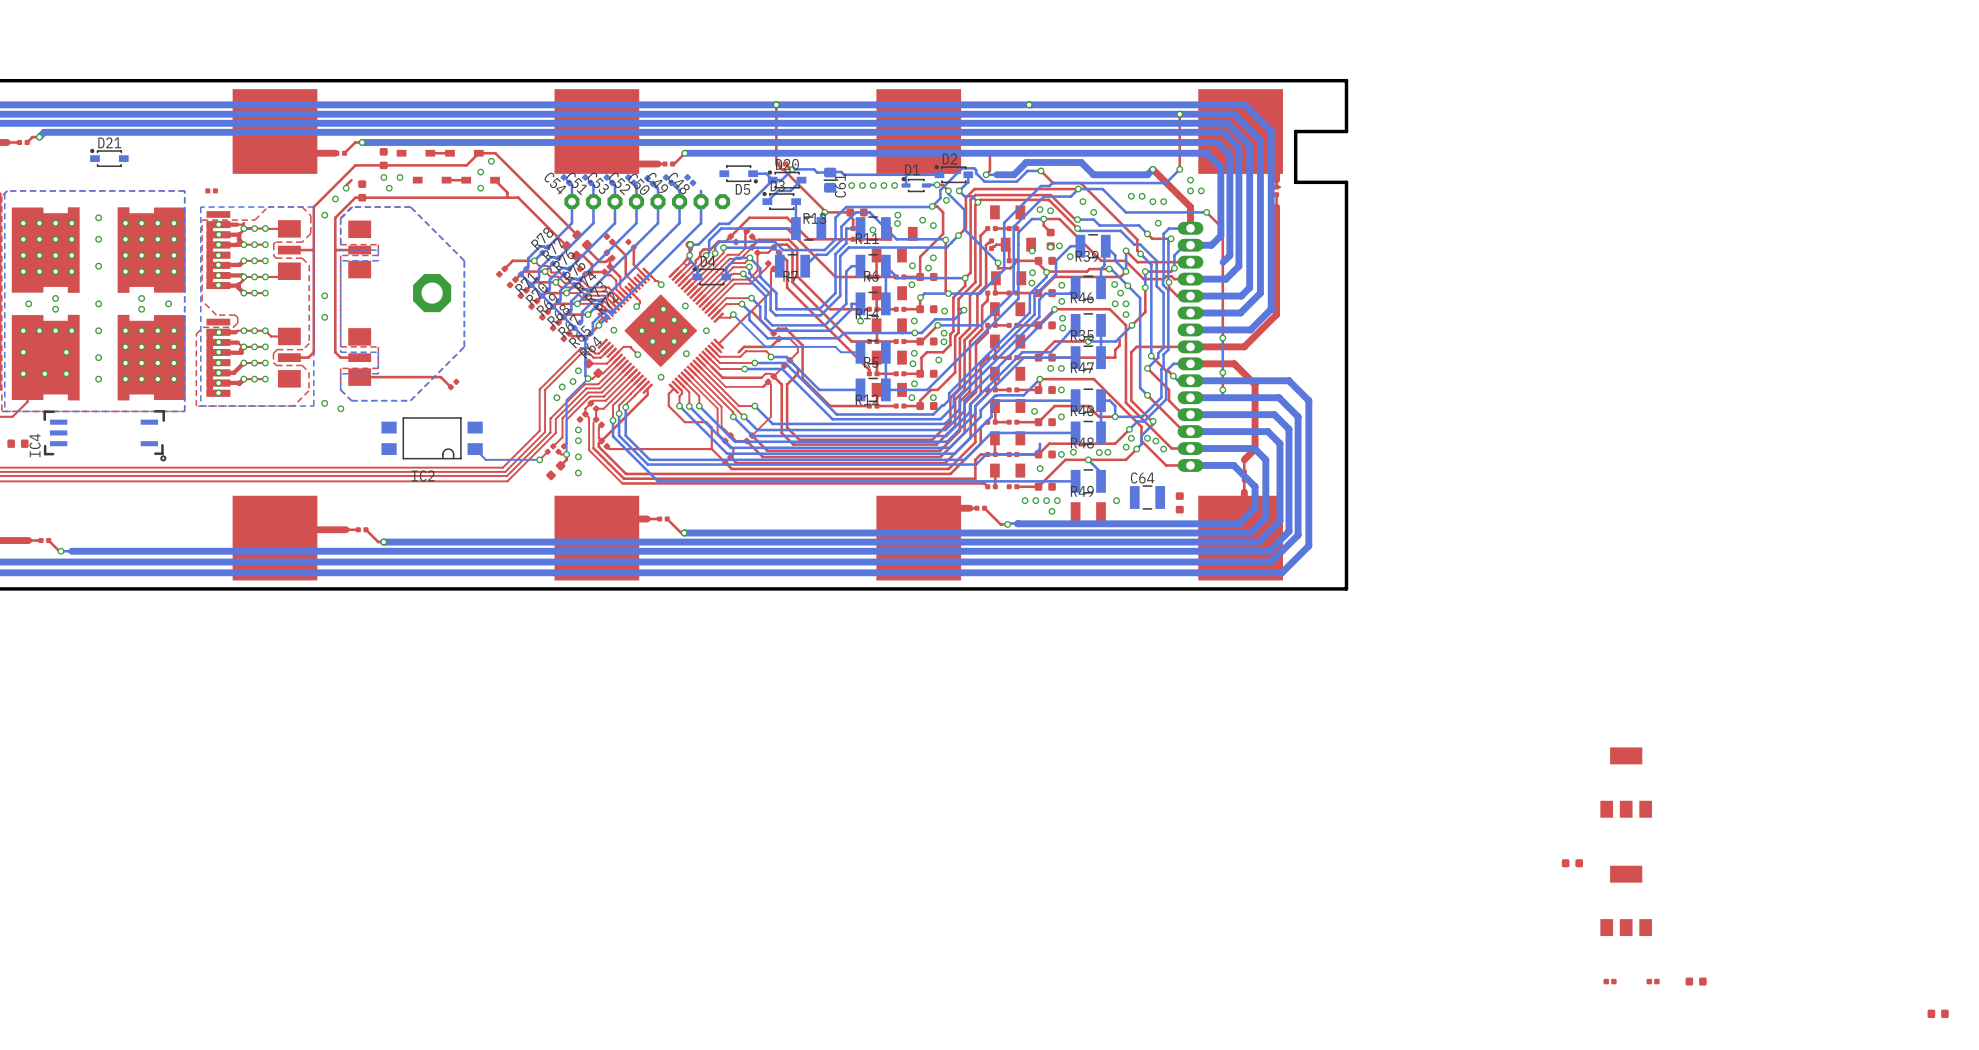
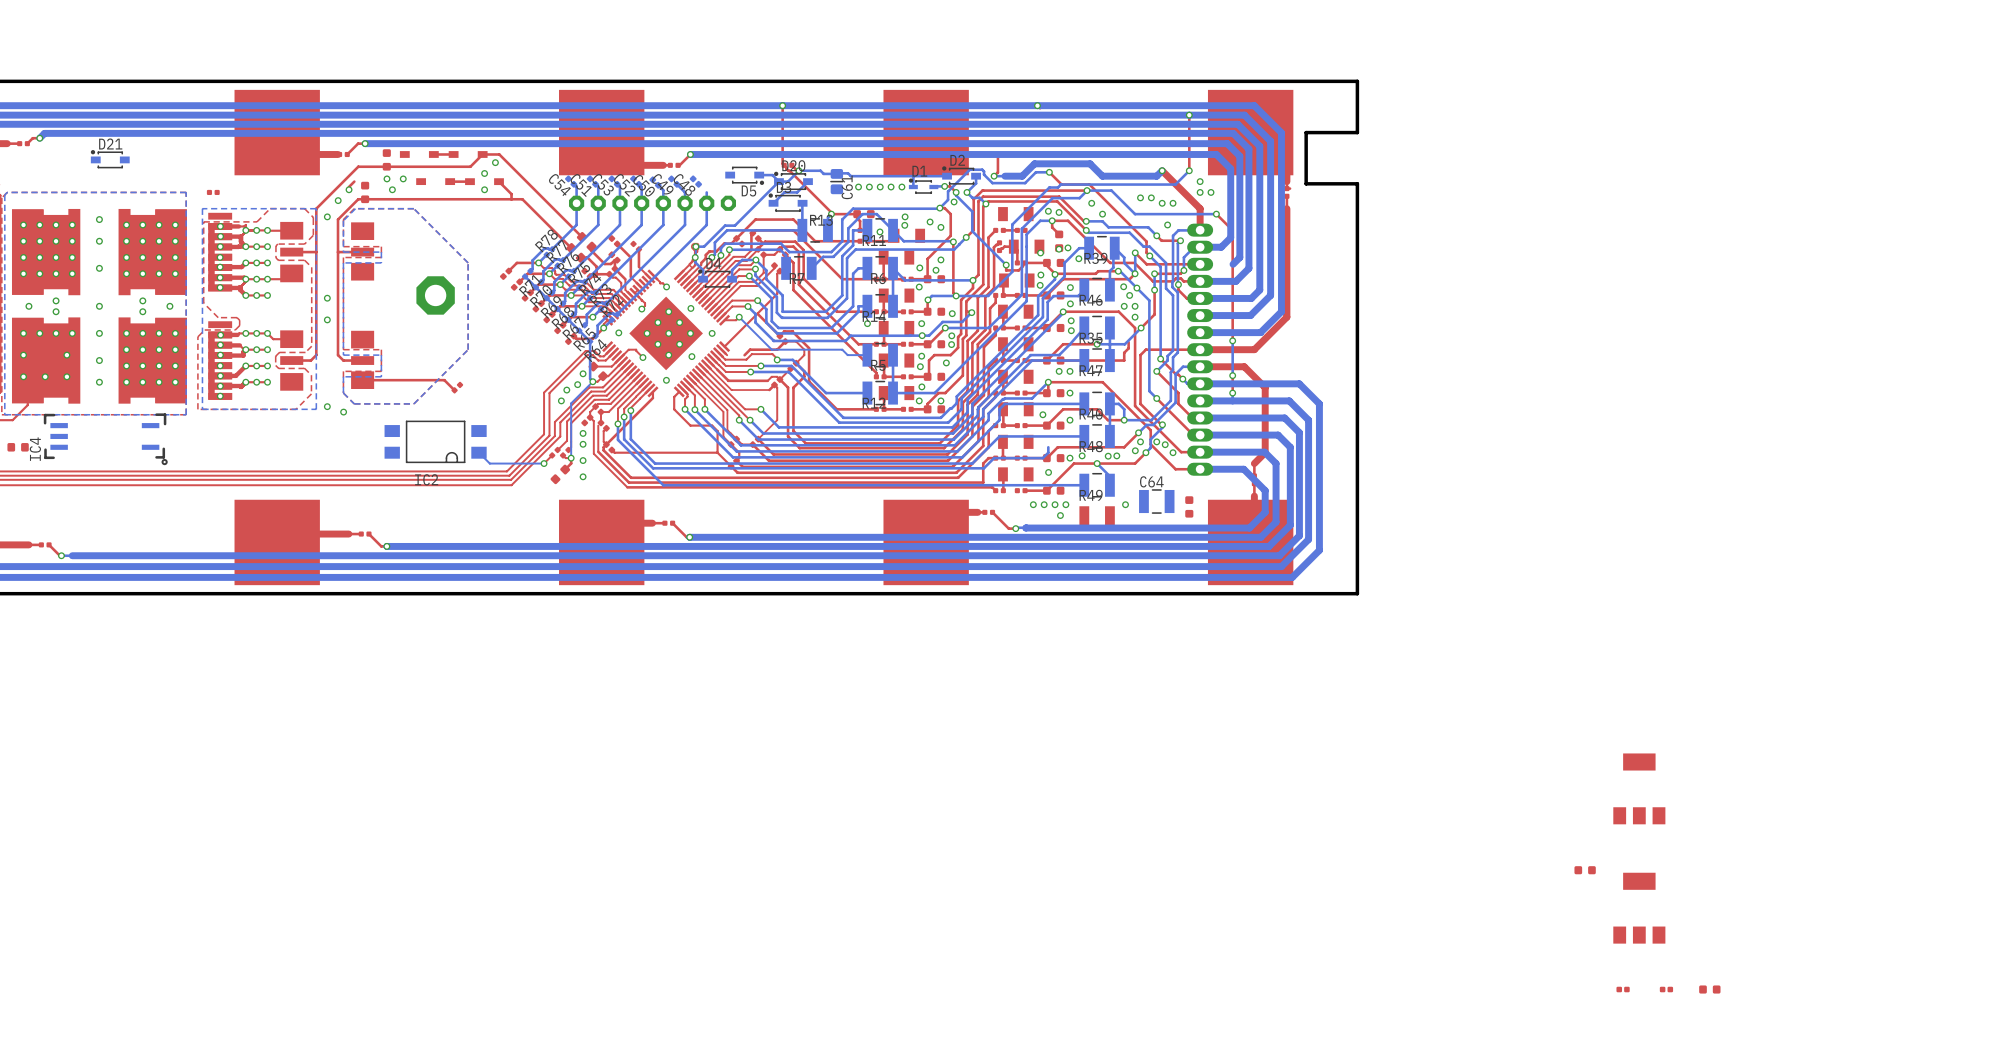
part: (1938, 1013) -> none

